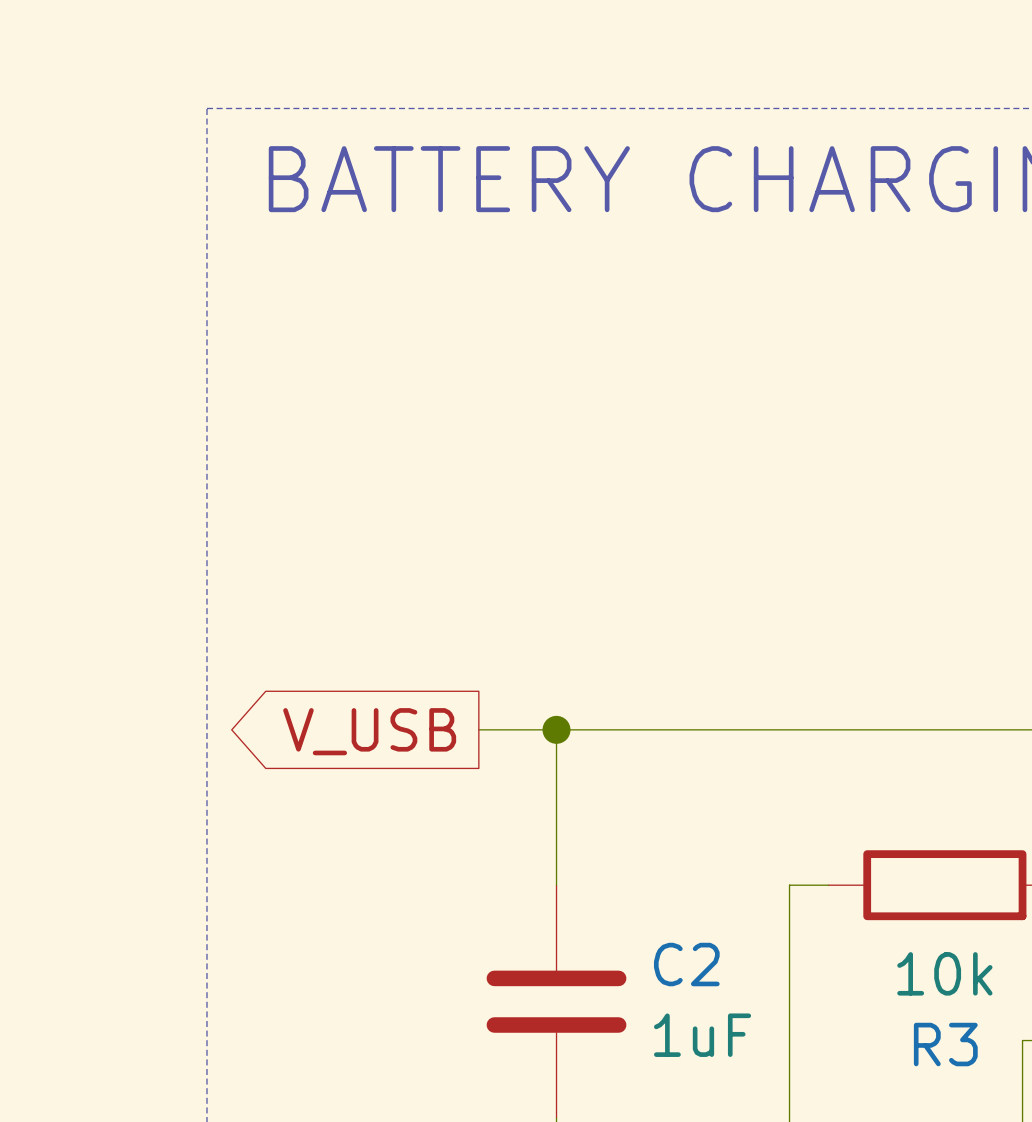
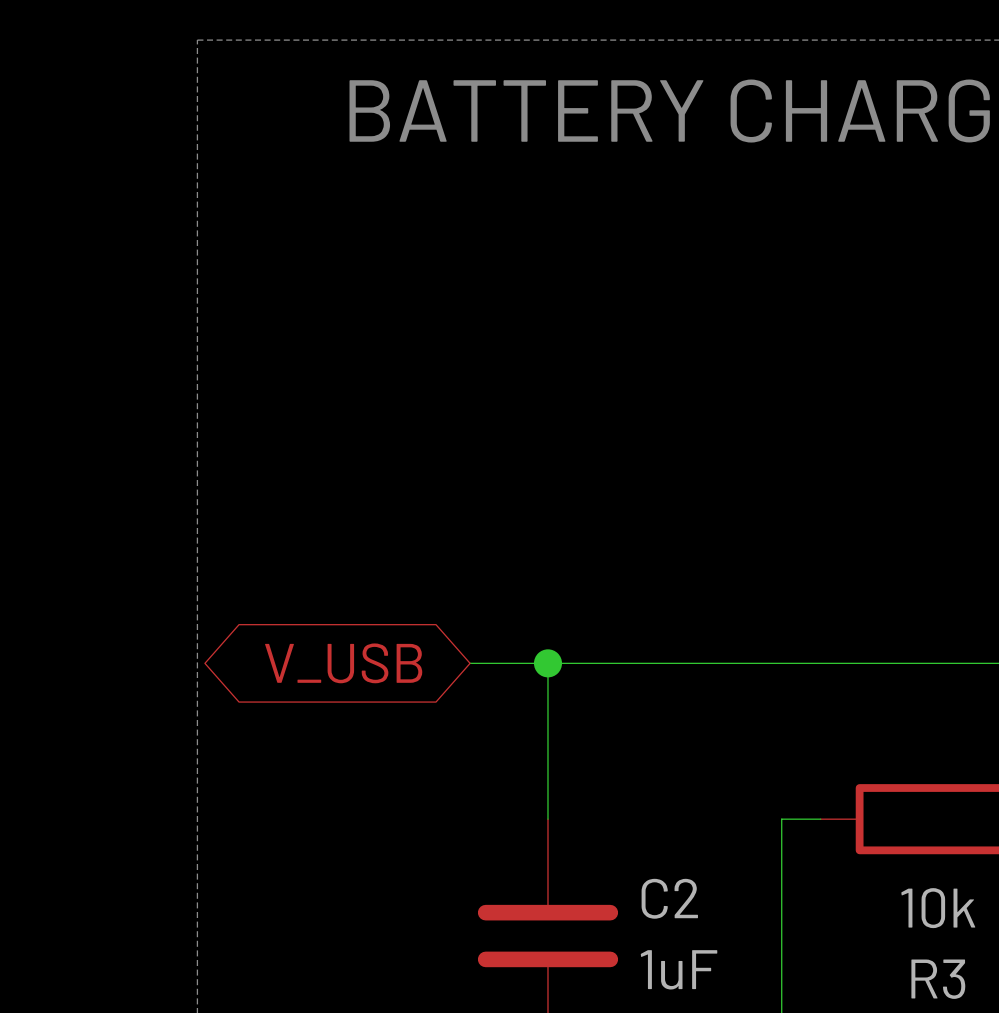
global label shape: output (369, 731) -> bidirectional (343, 663)

